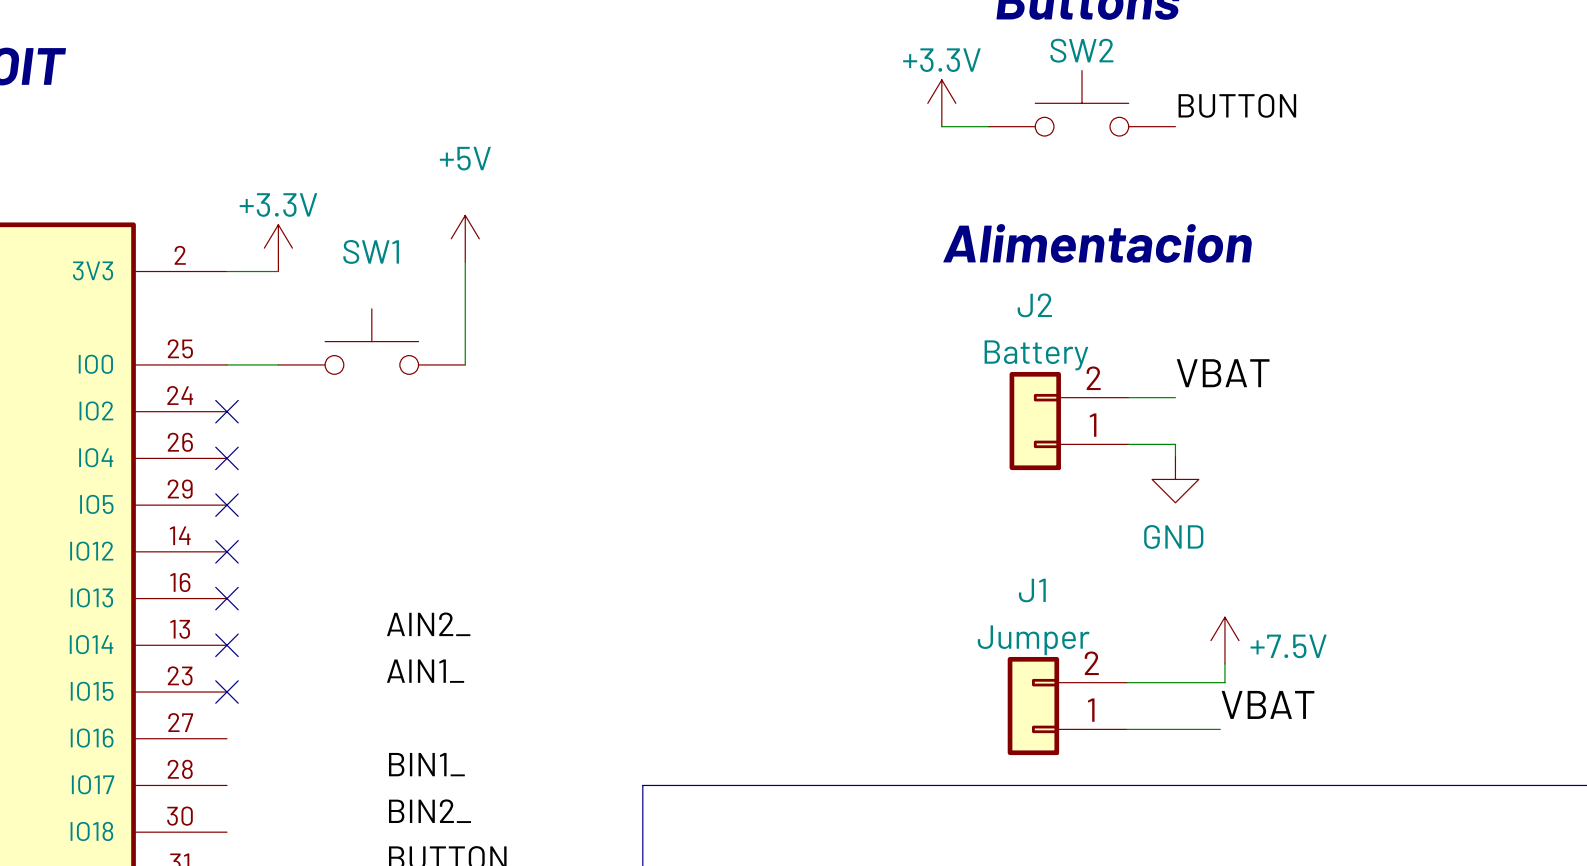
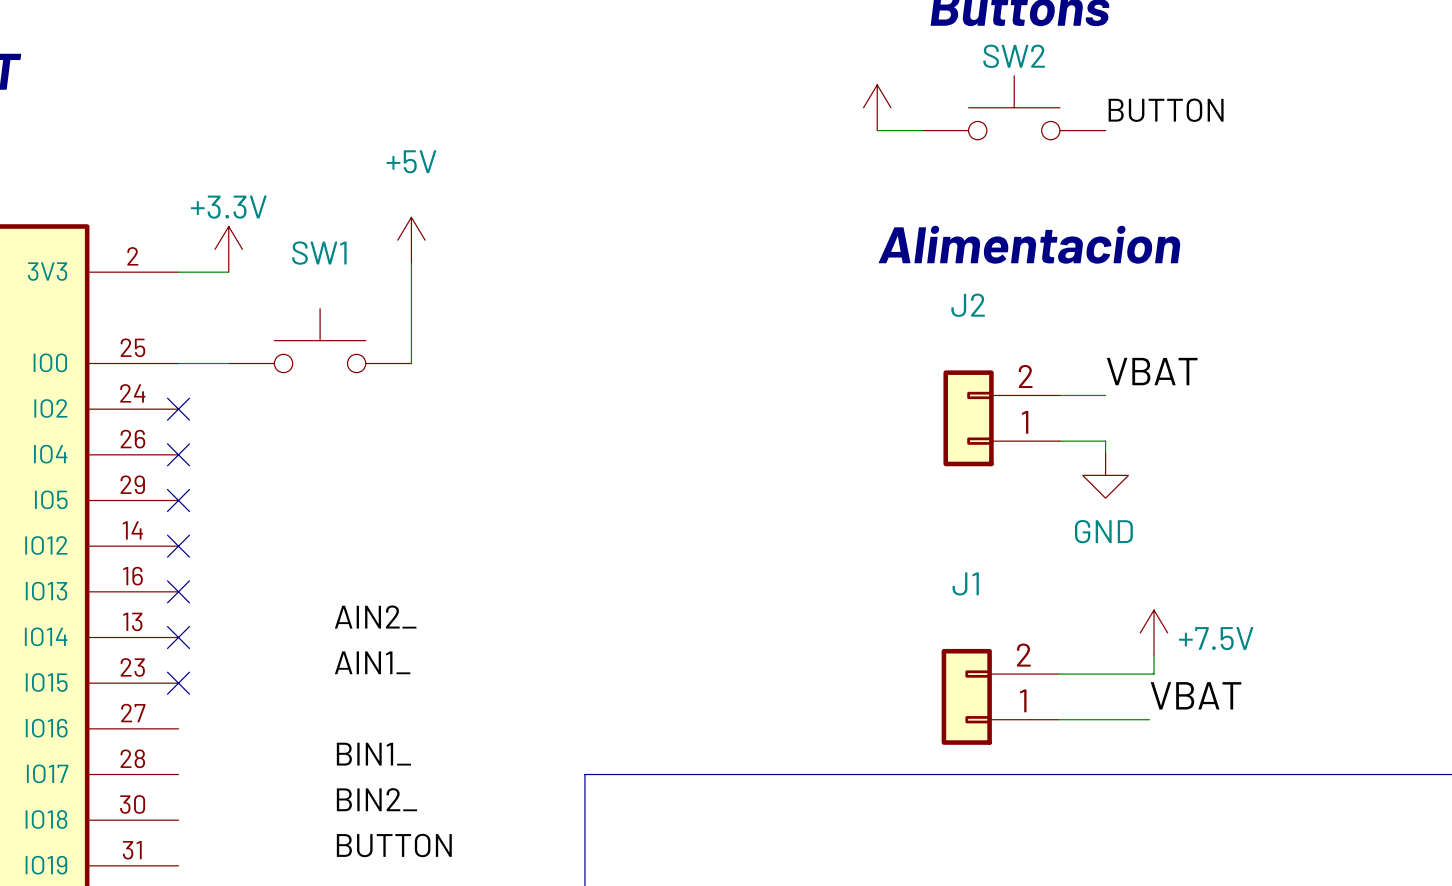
power symbol text: +3.3V (941, 60) -> none
J2 value: Battery (1036, 355) -> none
J1 value: Jumper (1033, 640) -> none

